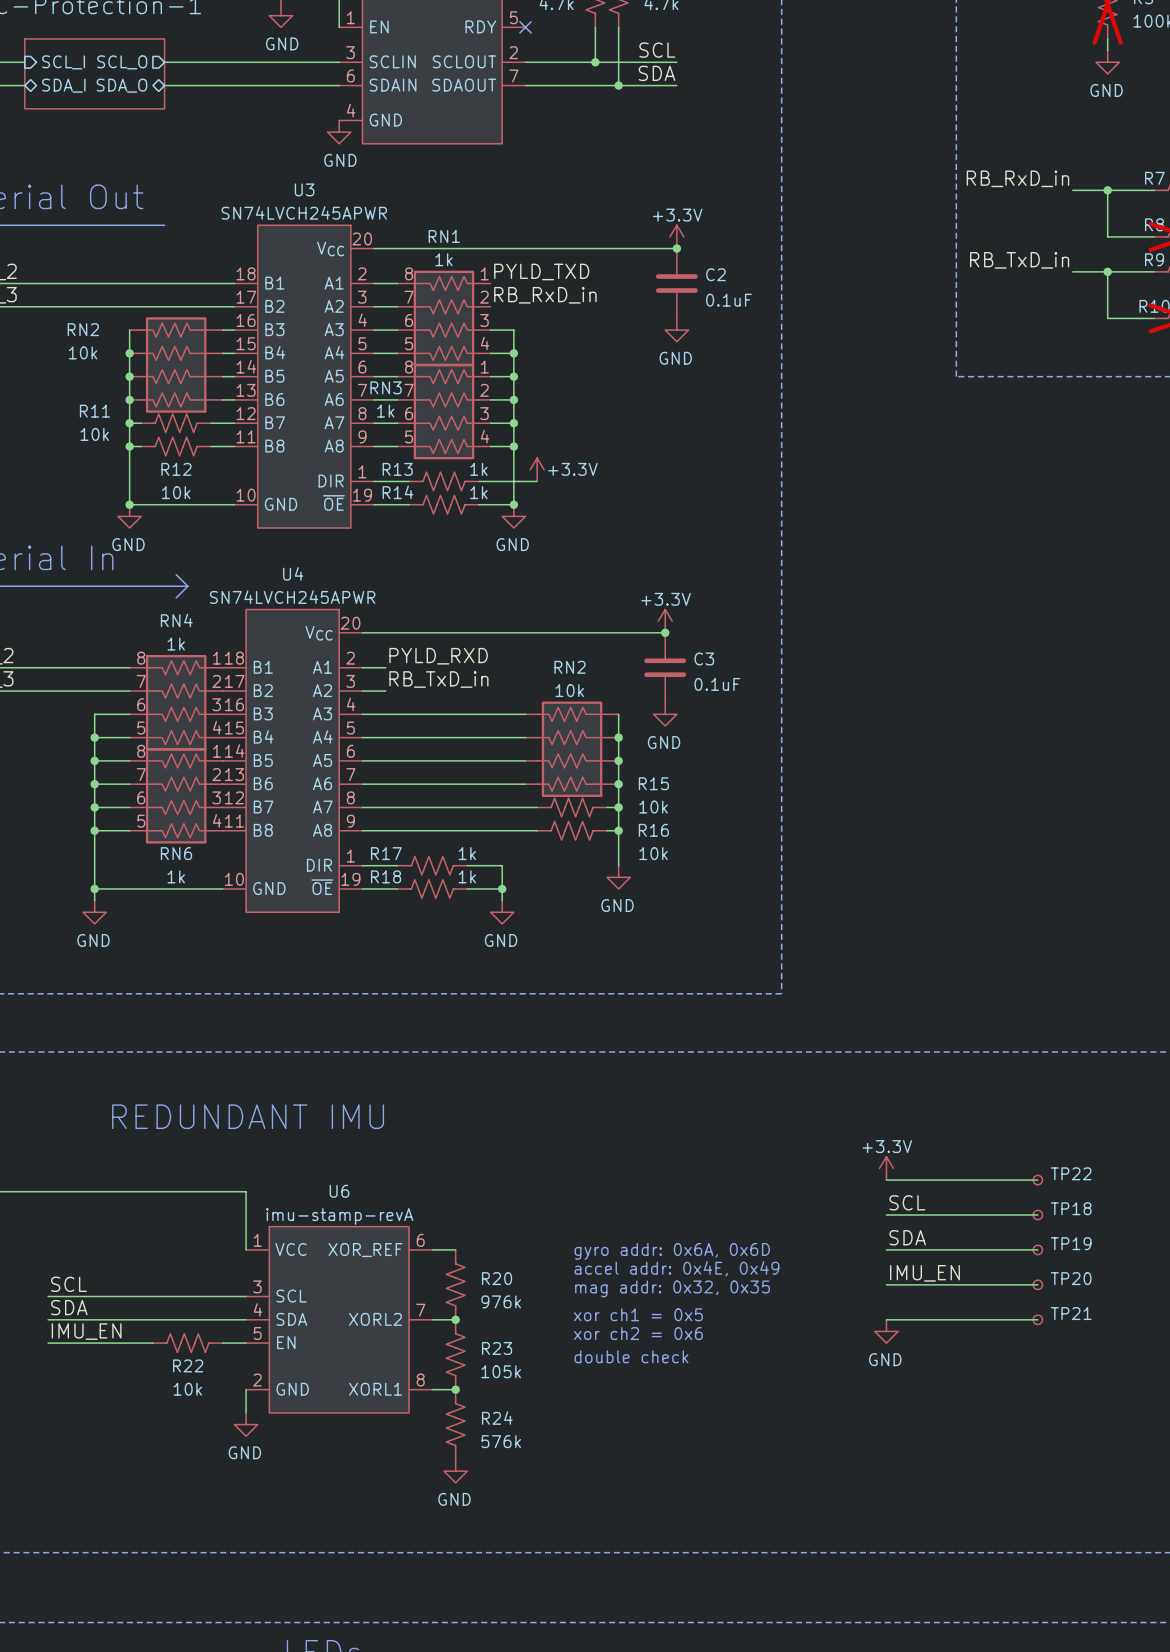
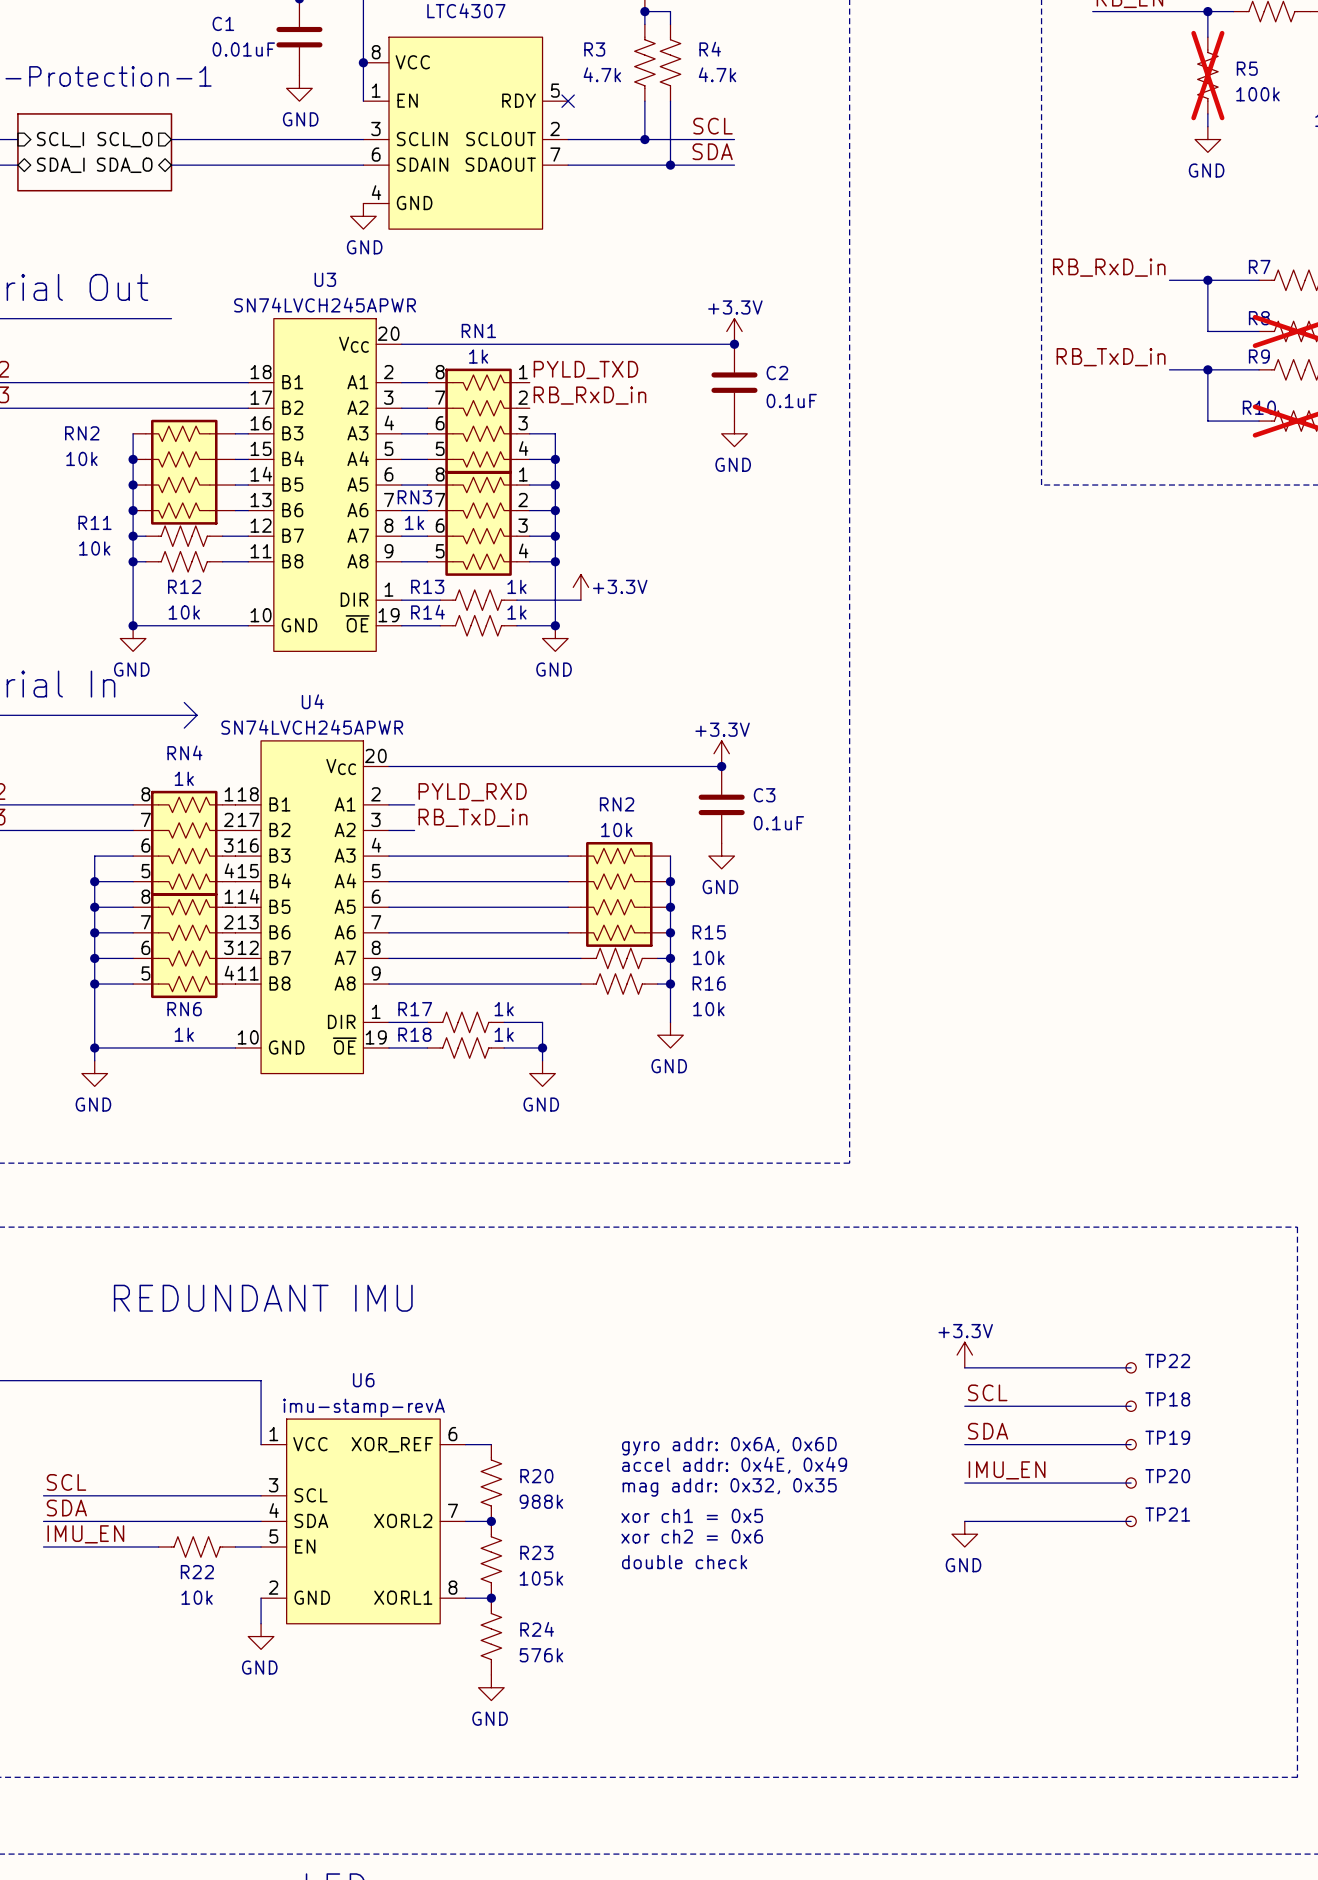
R20 value: 976k (501, 1301) -> 988k (541, 1501)

